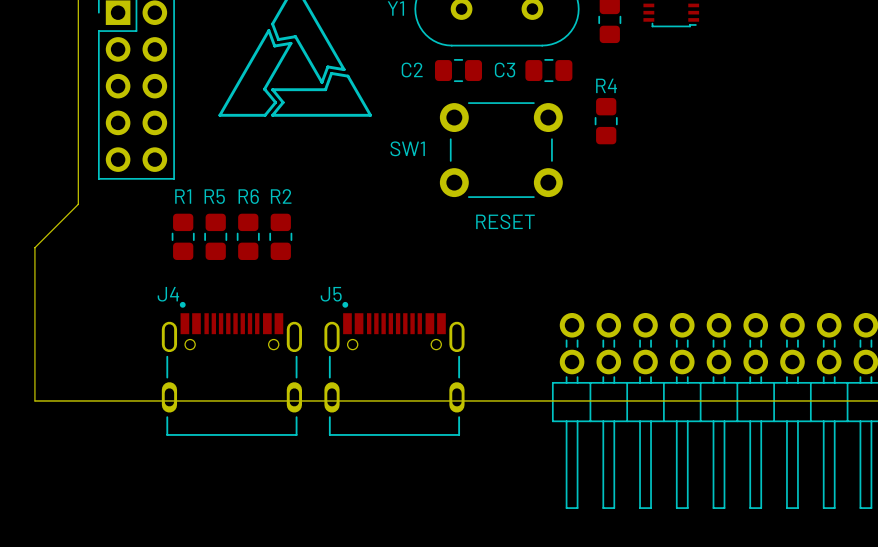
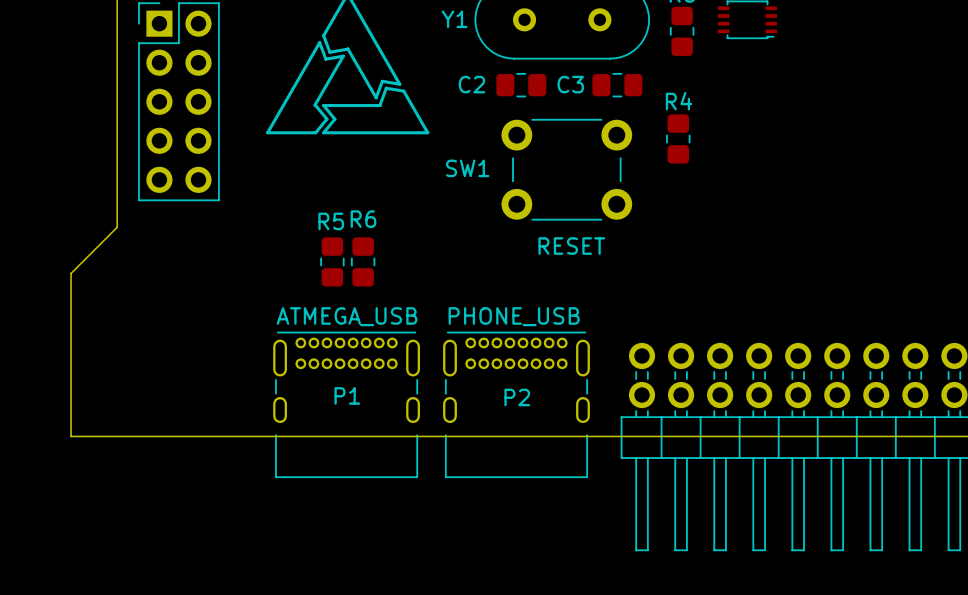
R2 name: R2 (281, 196) -> R5 (331, 221)
R1: (183, 236) -> none
R5: (215, 236) -> none
R6 position: (248, 236) -> (363, 261)
text: none -> ATMEGA_USB (347, 316)
text: none -> PHONE_USB (514, 316)
J4: (231, 368) -> none
J5: (394, 368) -> none
P1: none -> (346, 404)
P2: none -> (516, 404)

